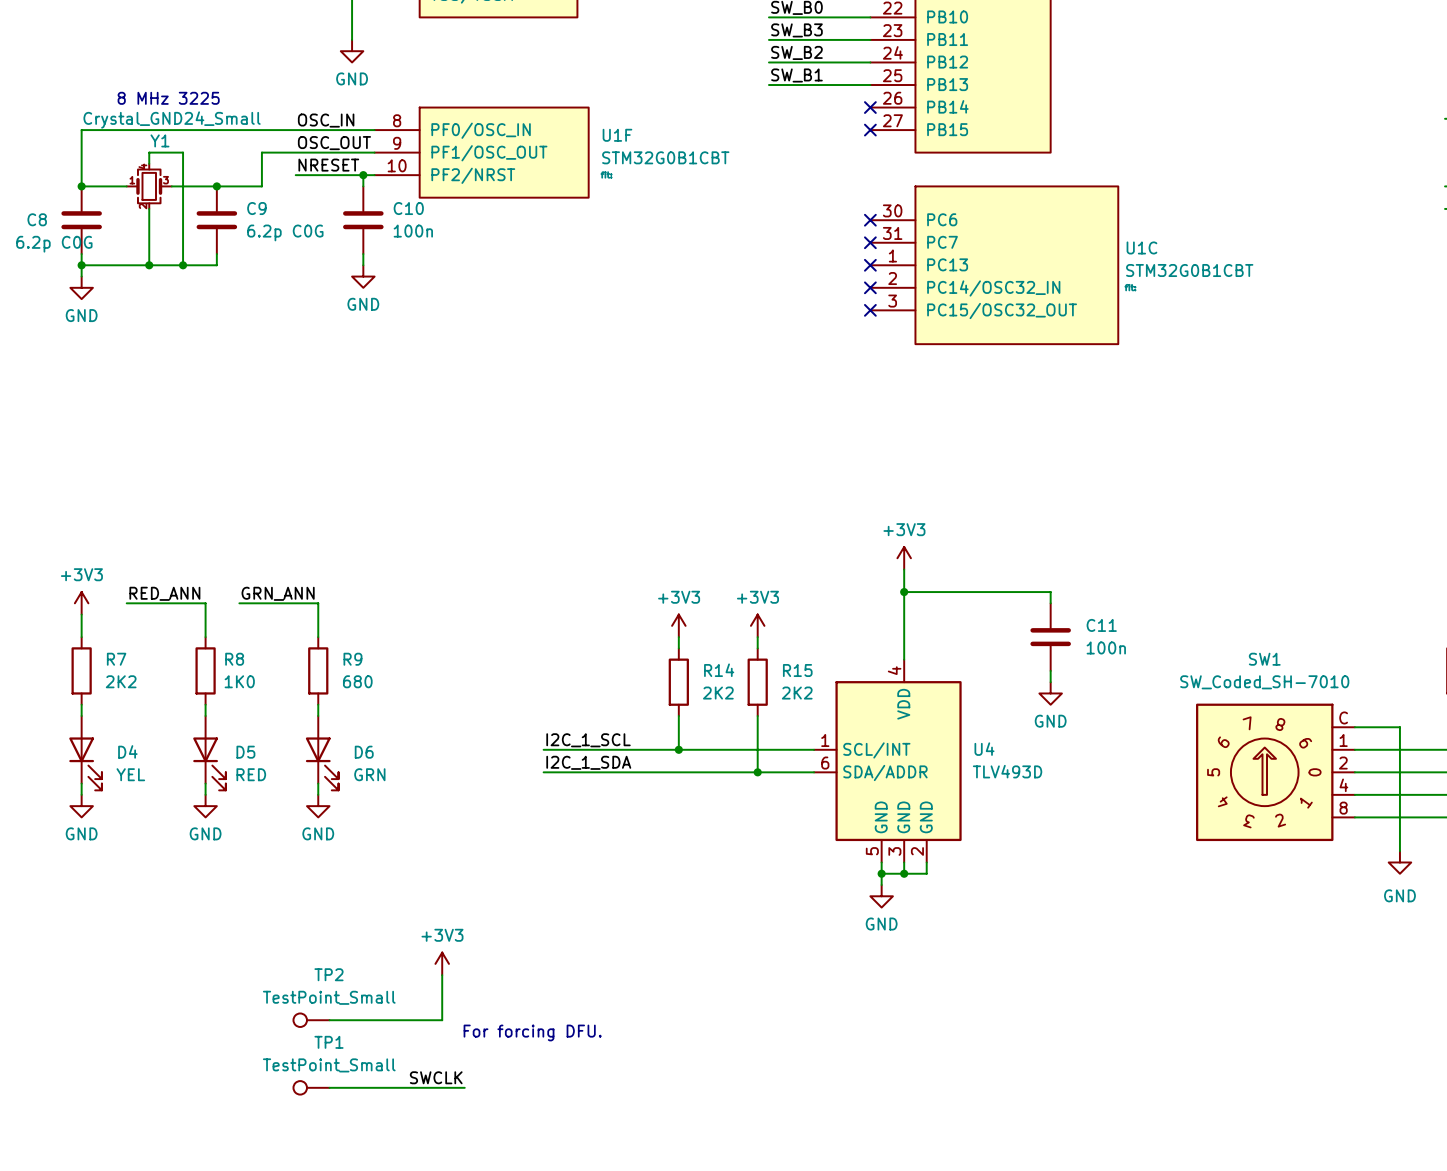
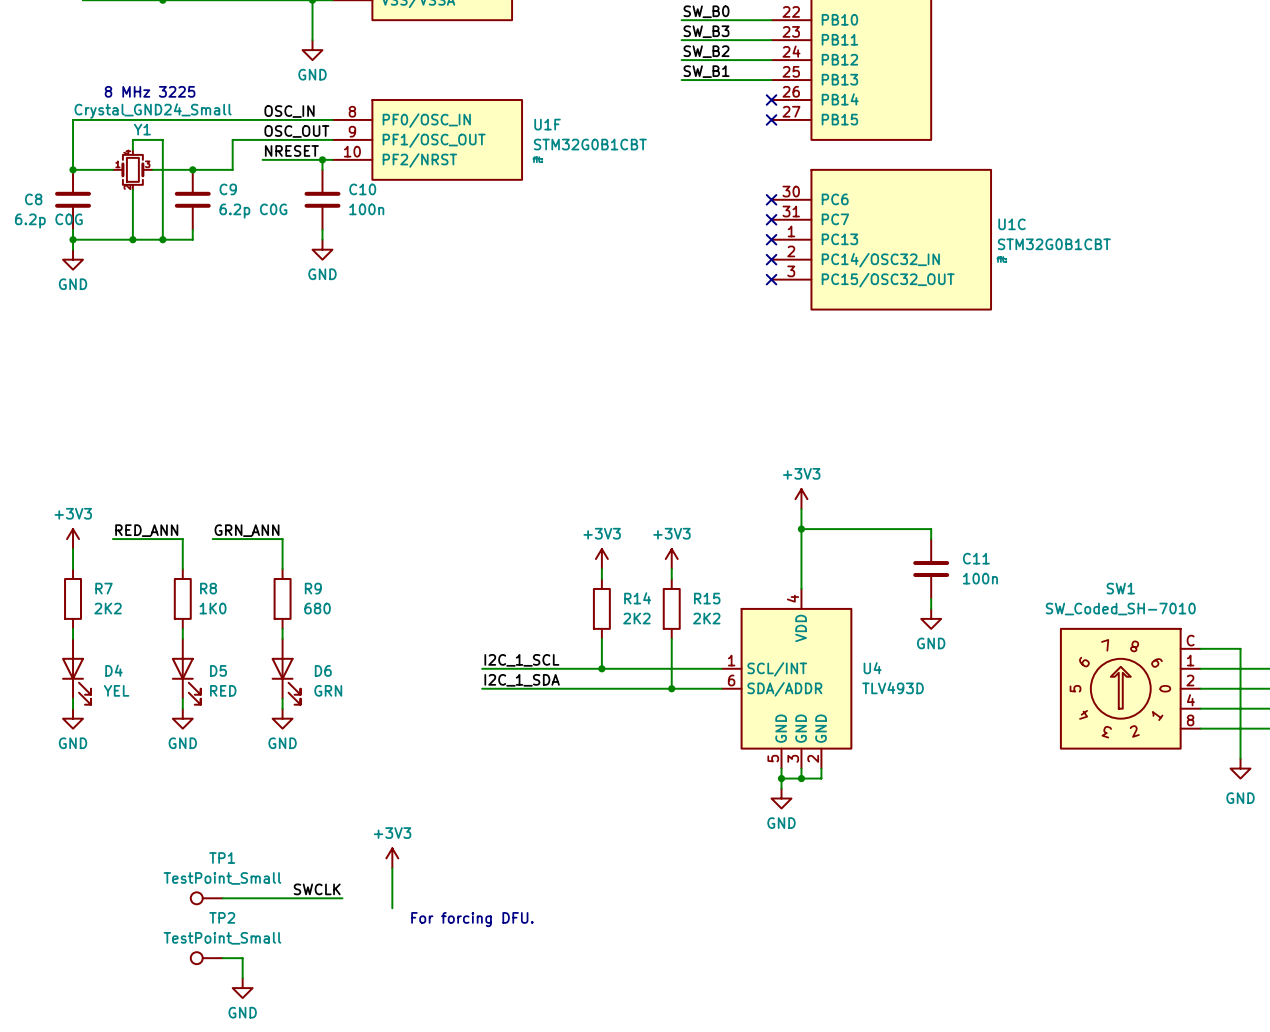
TP2 position: (311, 1020) -> (206, 958)
wire: (329, 1020) (442, 1020) -> none
wire: none -> (222, 958) (242, 958) (242, 978)
label position: SWCLK (436, 1077) -> SWCLK (317, 889)
TP1 position: (311, 1087) -> (206, 898)
wire: (329, 1087) (464, 1087) -> (222, 898) (342, 898)
power symbol: none -> GND (242, 988)

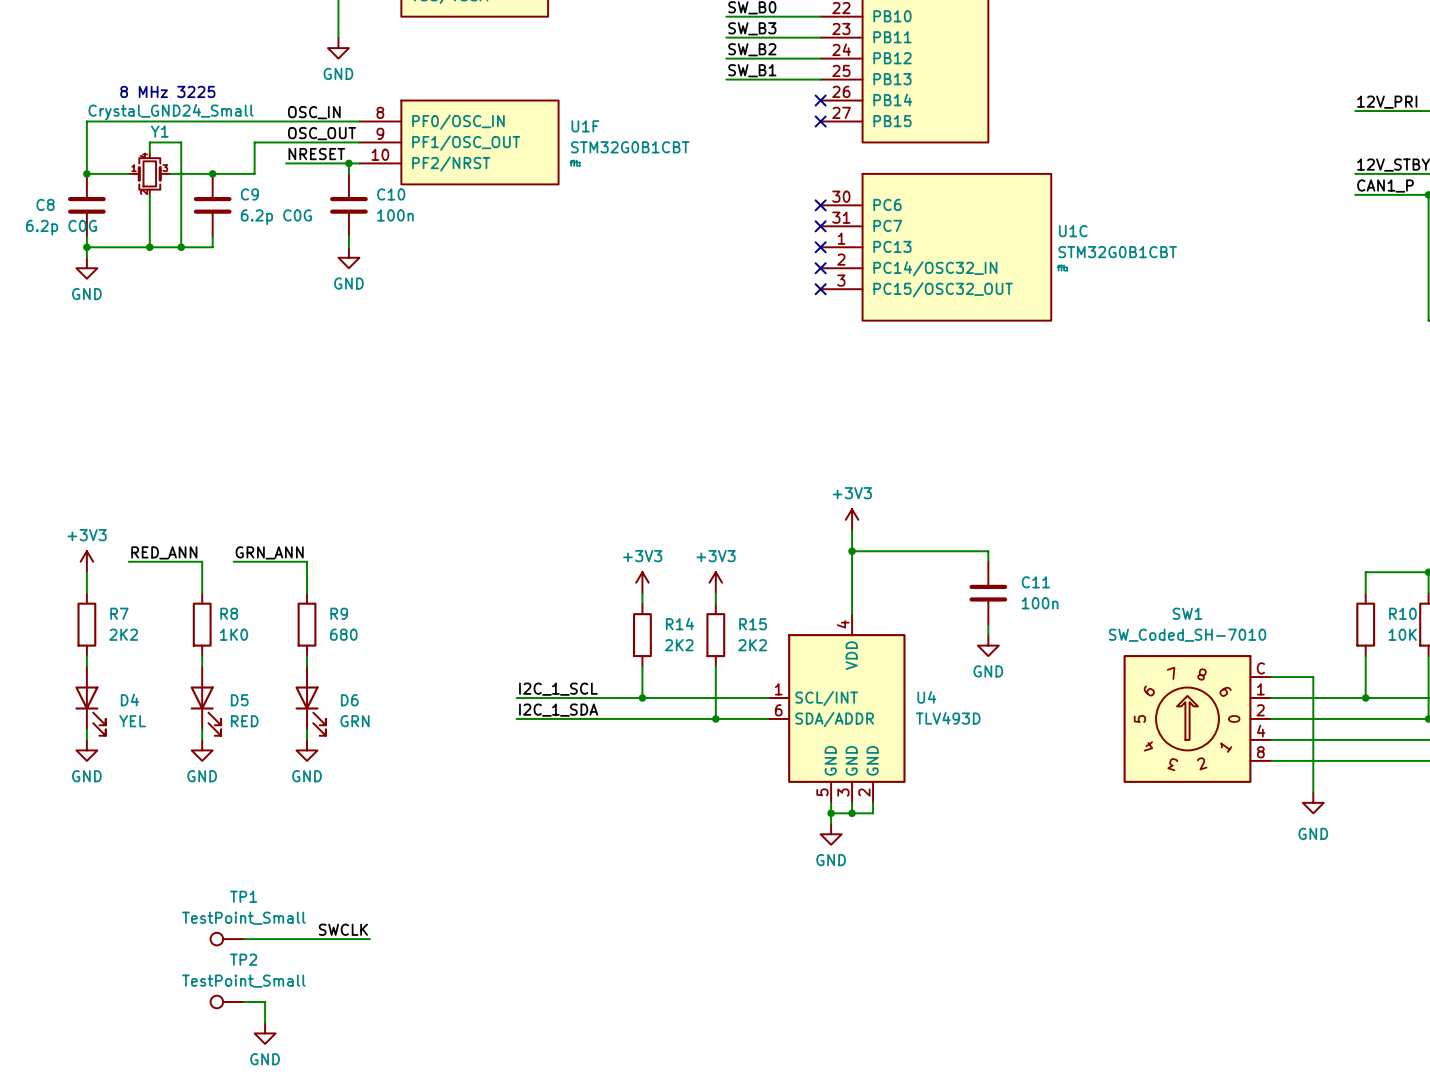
power symbol: +3V3 (392, 858) -> none
wire: (392, 868) (392, 908) -> none
text: For forcing DFU. (472, 919) -> none

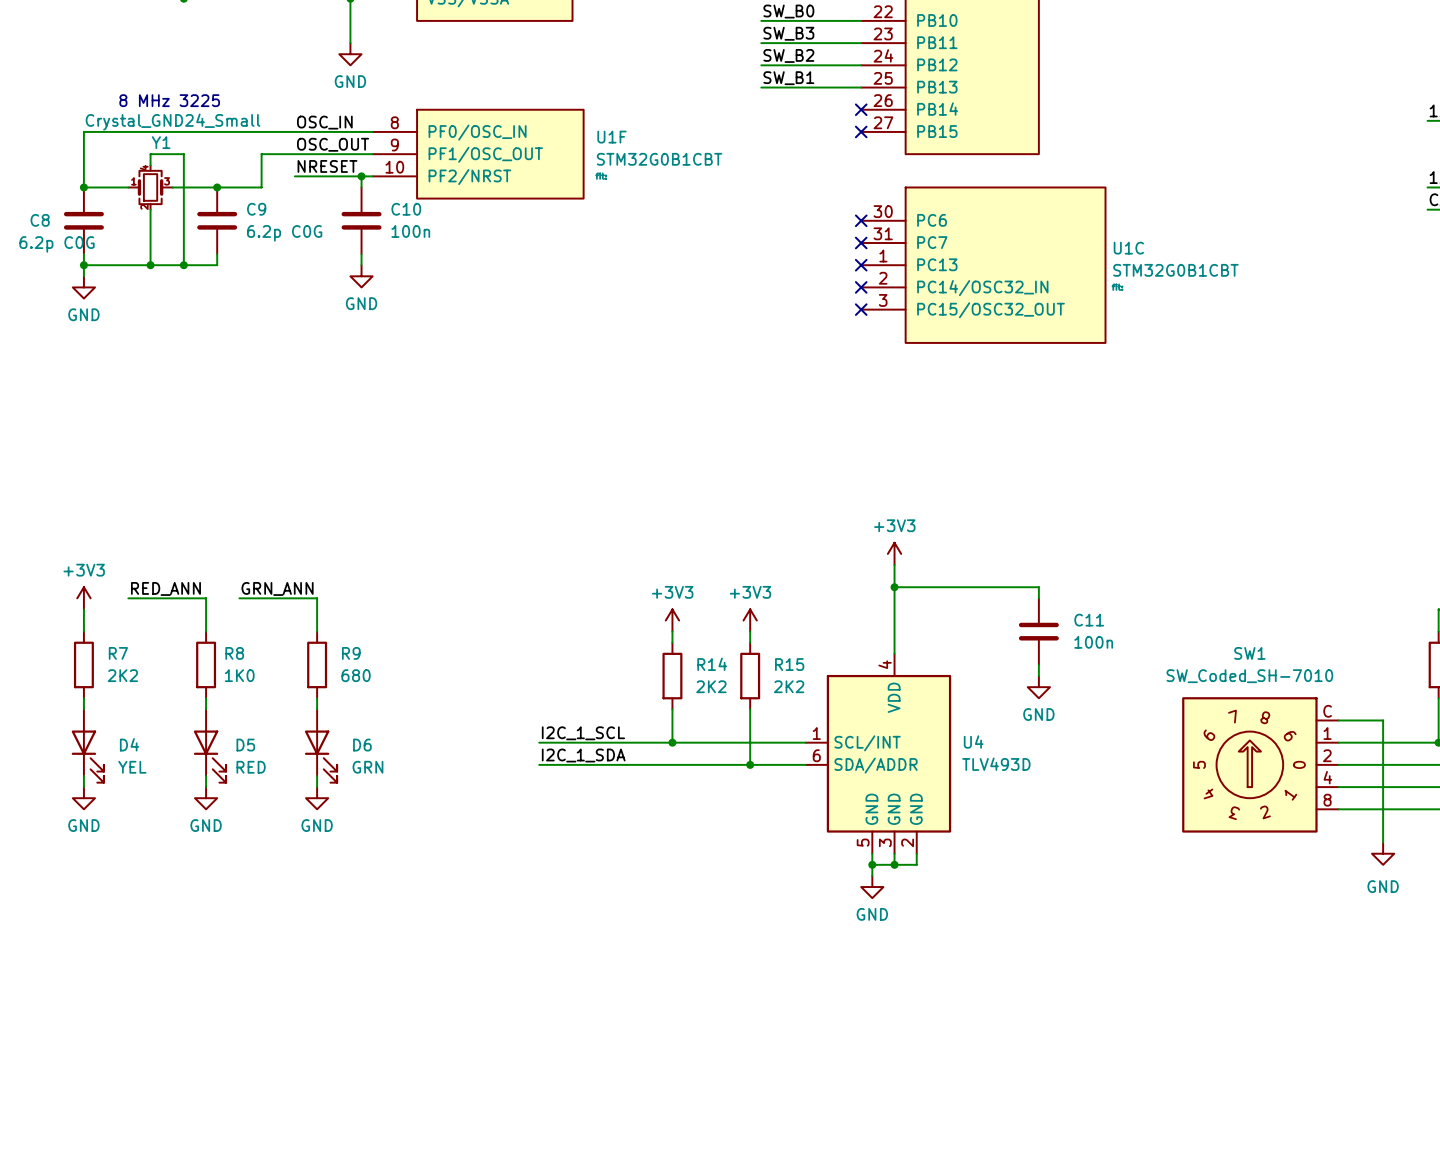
label: SWCLK (343, 929) -> none
TP1: TestPoint_Small (227, 939) -> none
wire: (244, 939) (369, 939) -> none
TP2: TestPoint_Small (227, 1001) -> none
wire: (244, 1001) (265, 1001) (265, 1022) -> none
power symbol: GND (265, 1033) -> none

